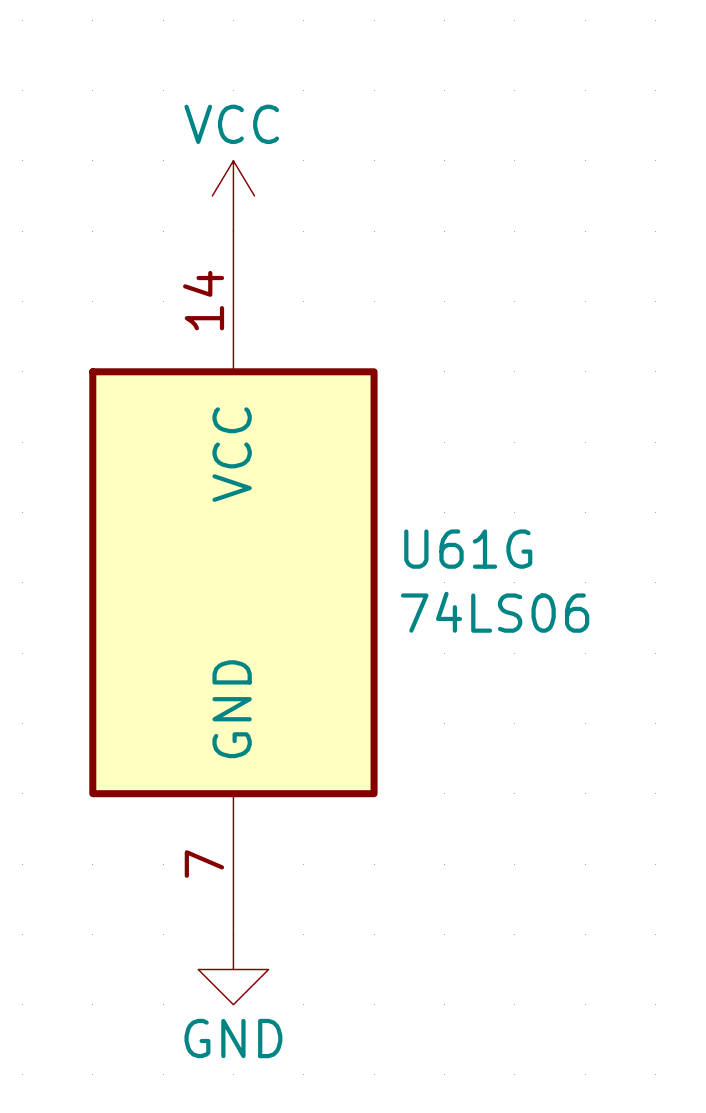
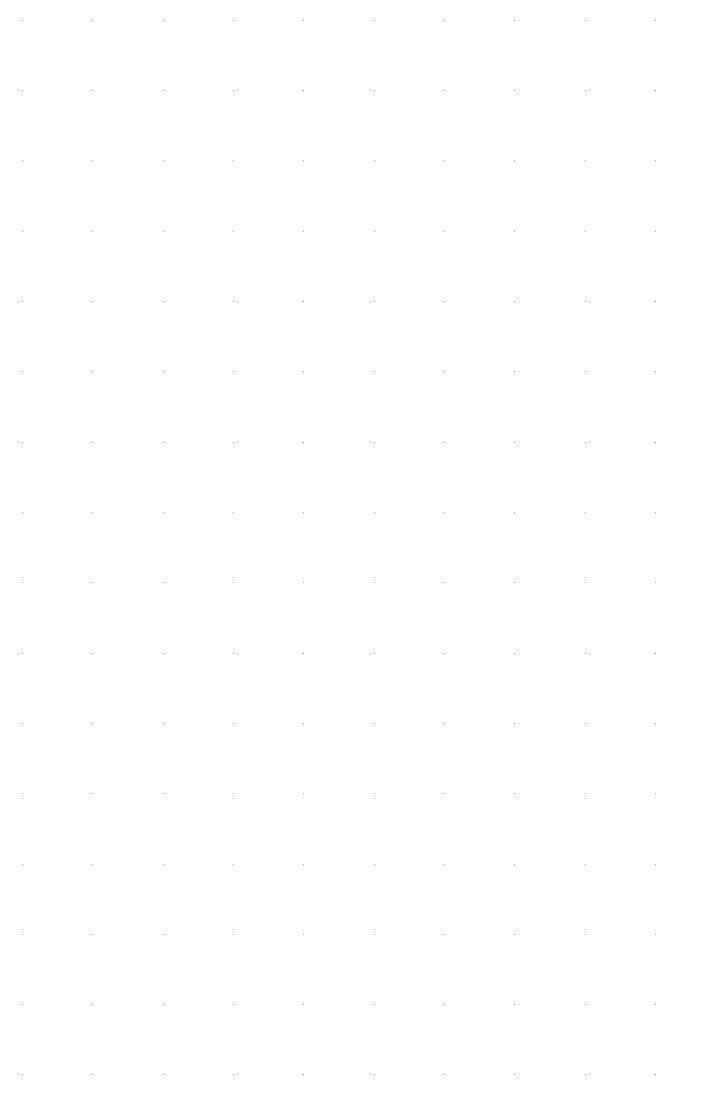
power symbol: VCC (233, 195) -> none
U61G: 74LS06 (233, 582) -> none
power symbol: GND (233, 969) -> none

